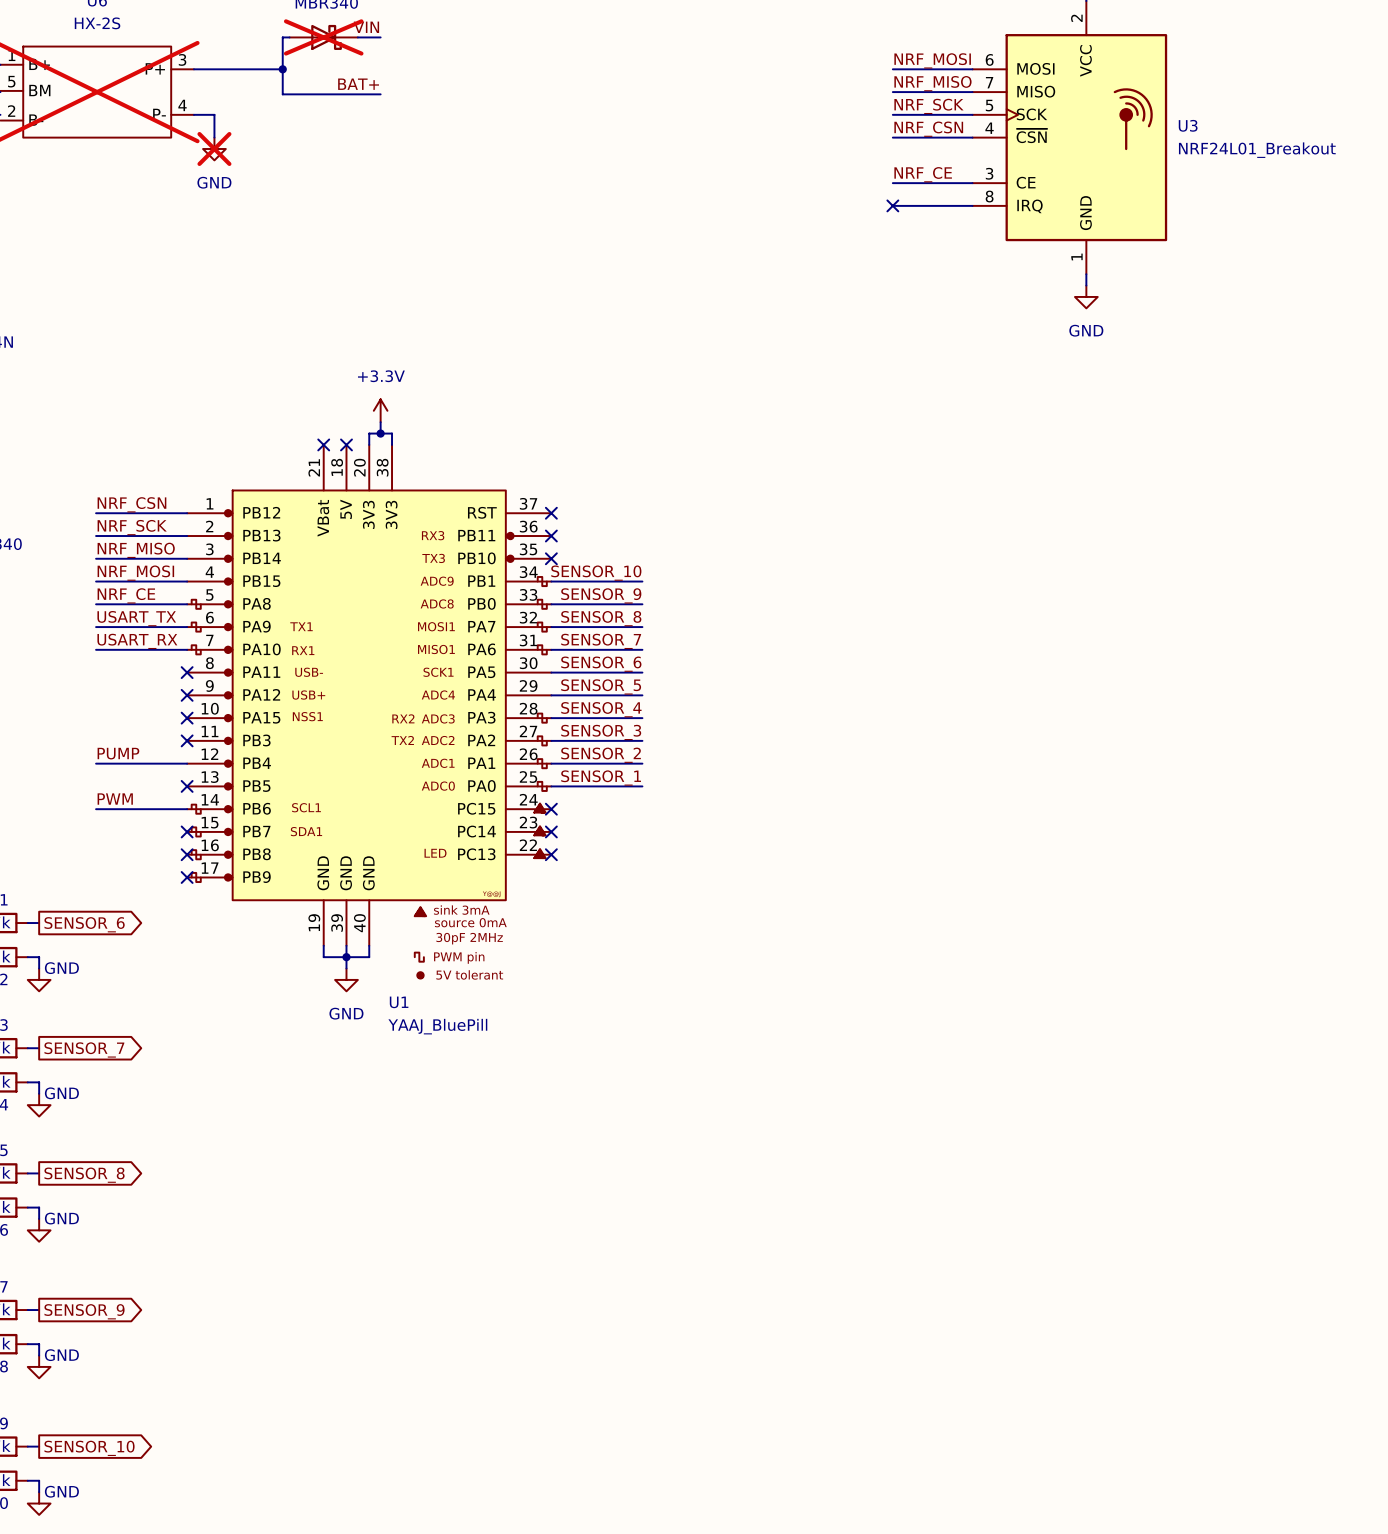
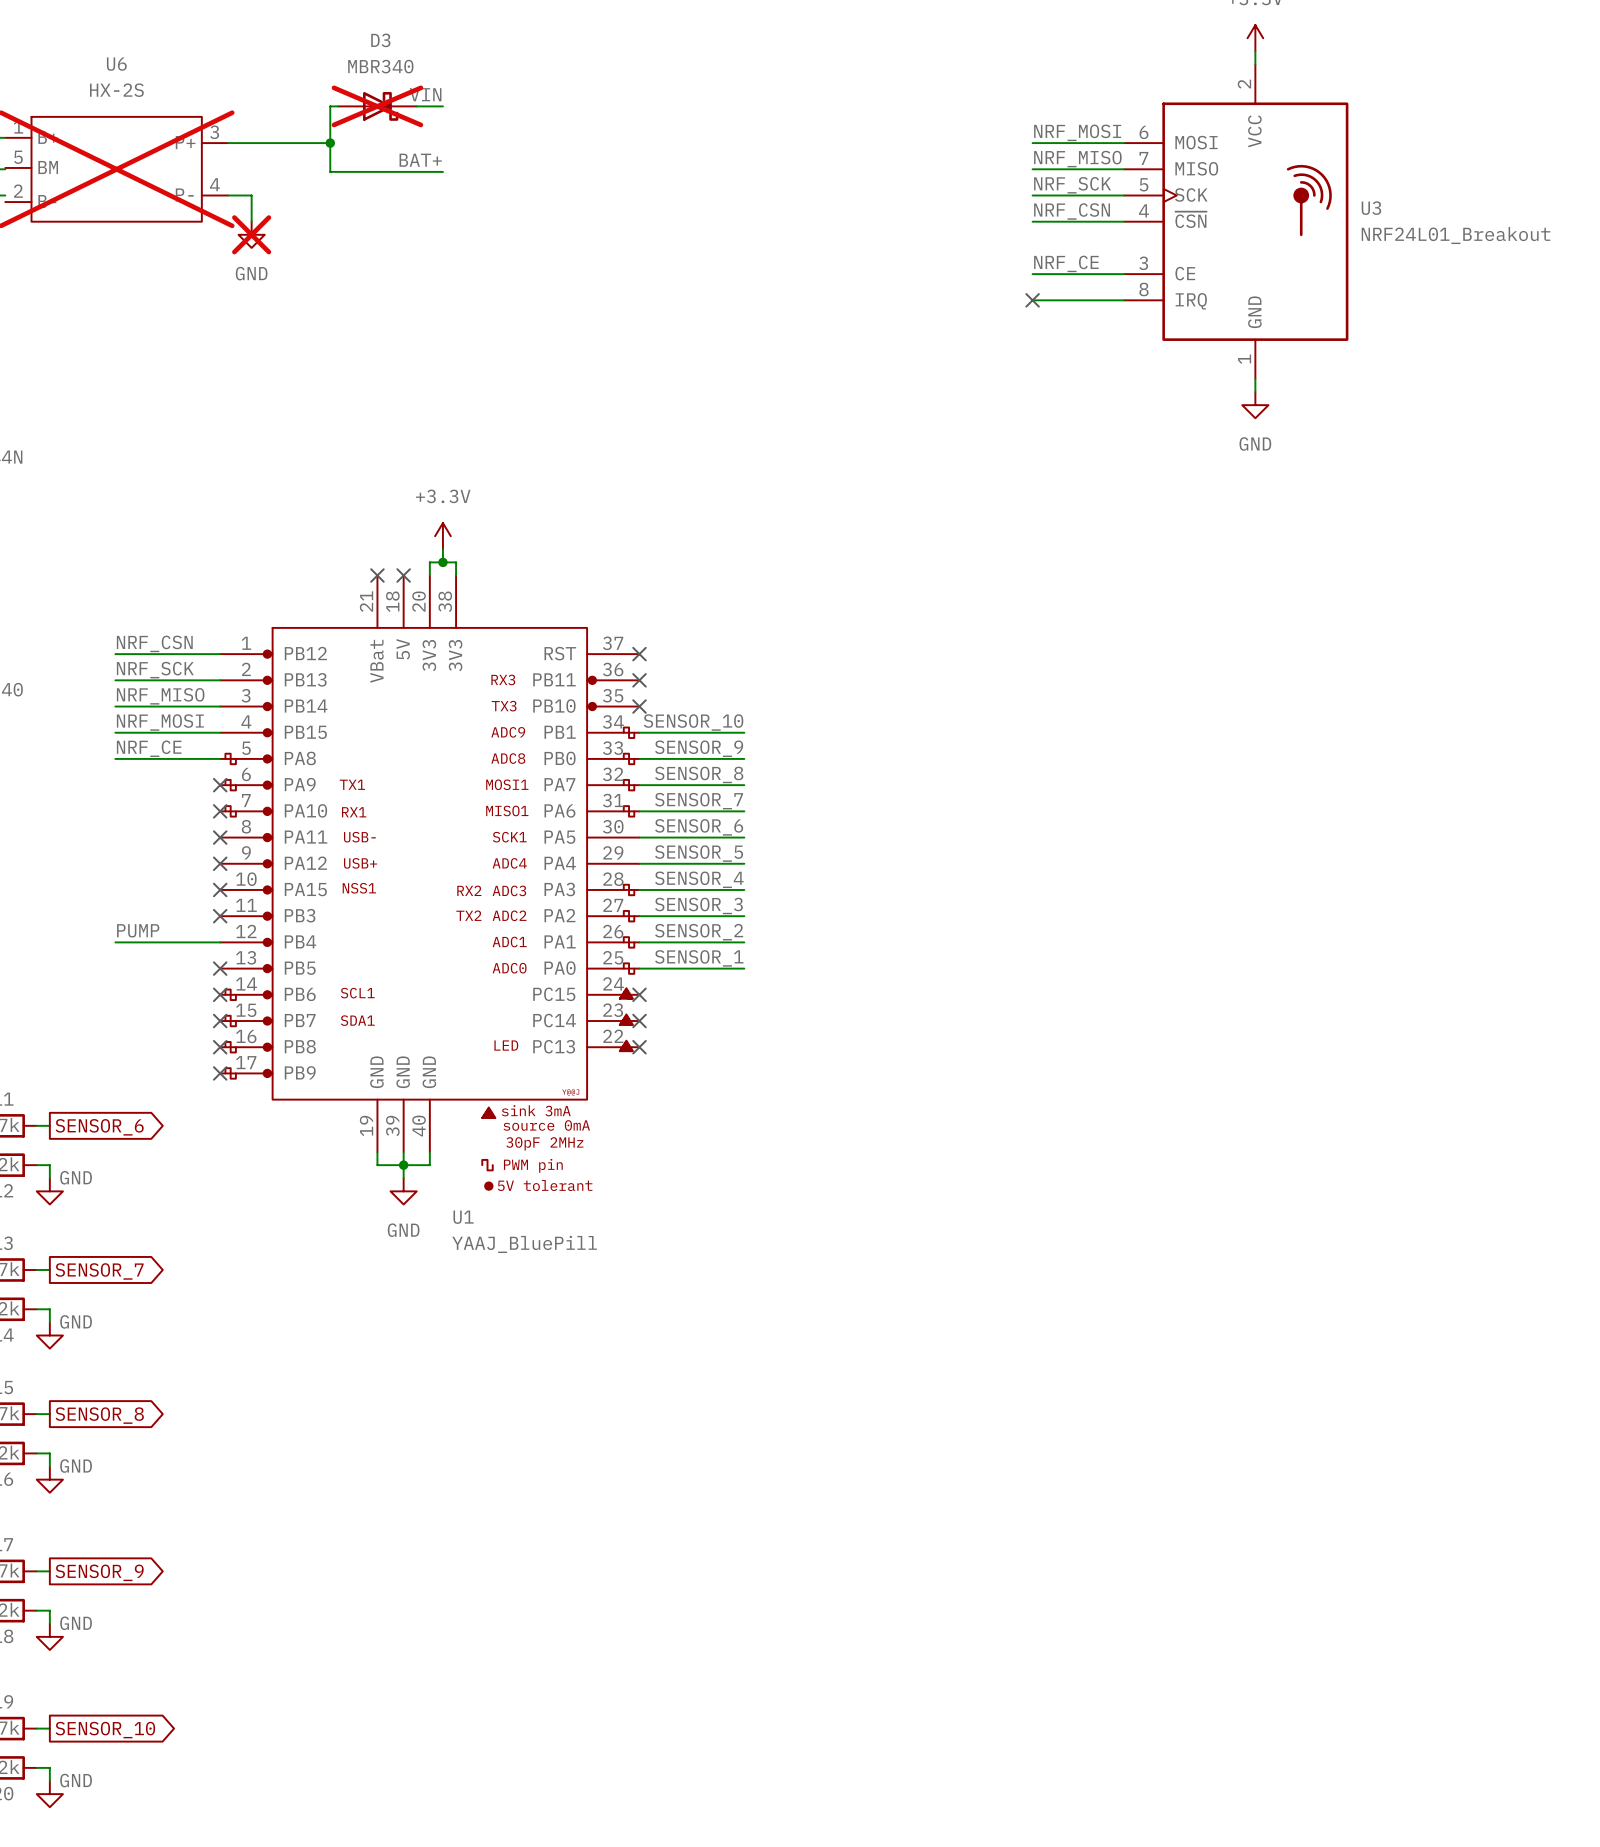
label: USART_TX (136, 618) -> none
wire: (96, 627) (187, 627) -> none
no-connect mark: none -> (220, 785)
label: USART_RX (137, 641) -> none
wire: (96, 649) (187, 649) -> none
no-connect mark: none -> (220, 811)
label: PWM (115, 799) -> none
wire: (96, 809) (187, 809) -> none
no-connect mark: none -> (220, 994)

